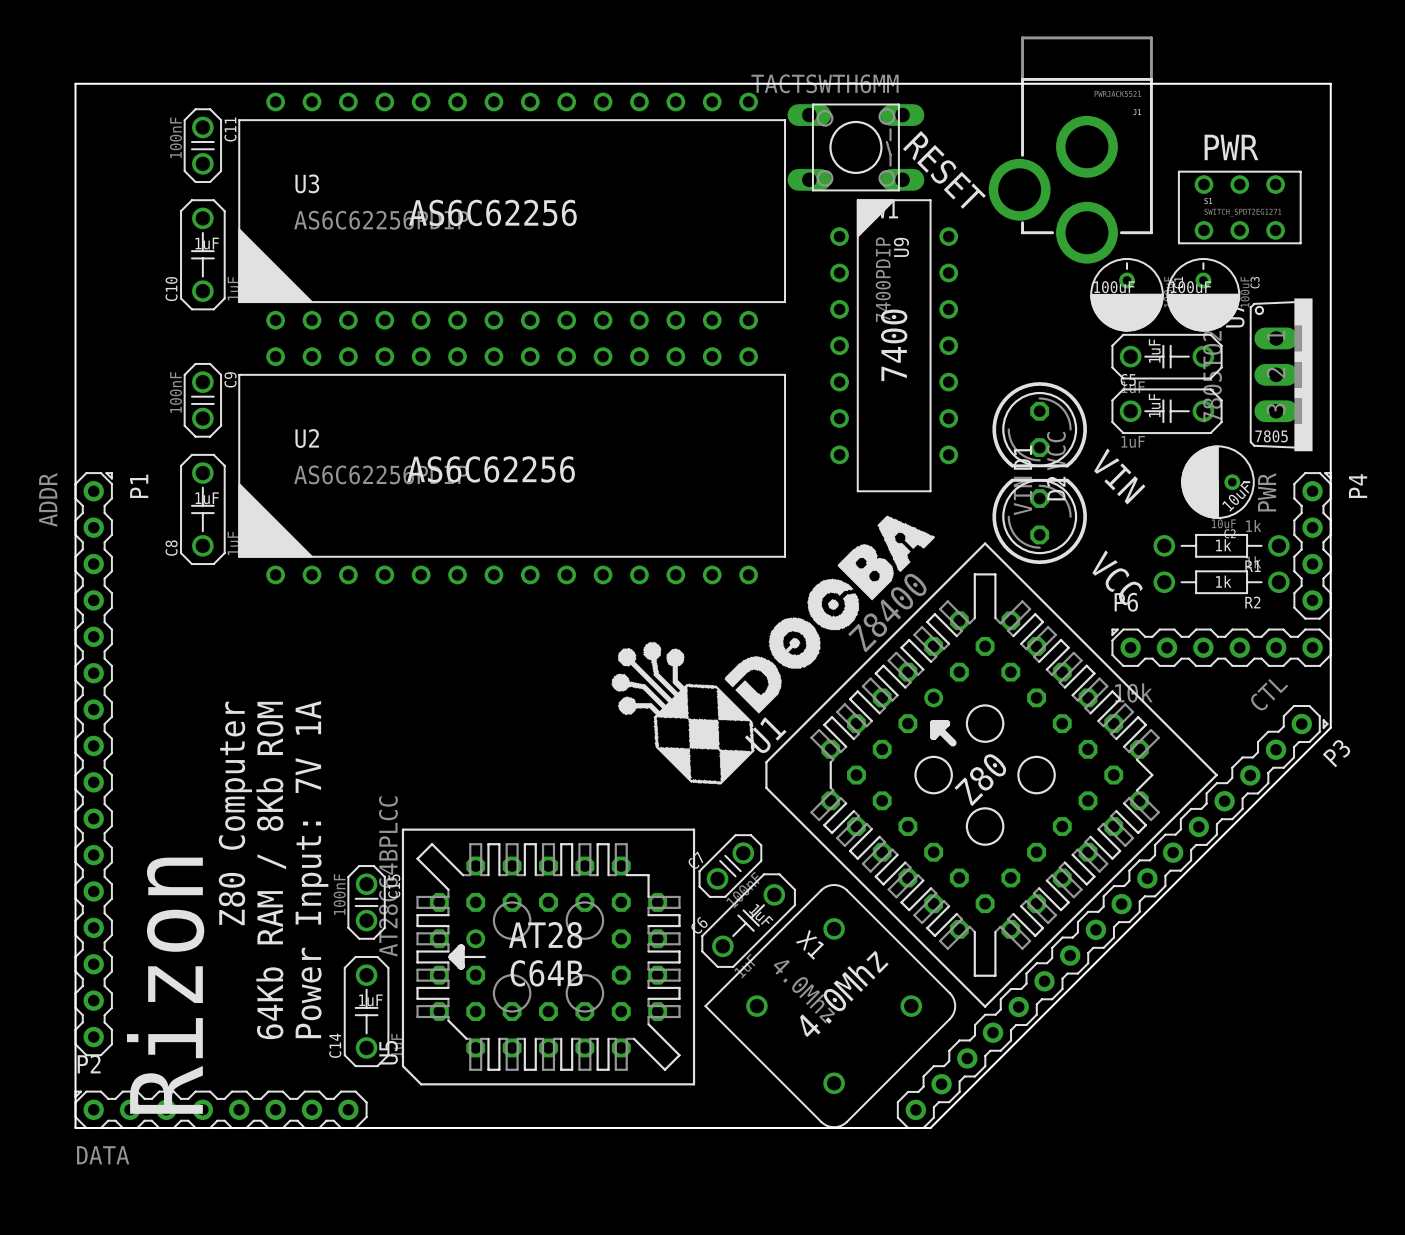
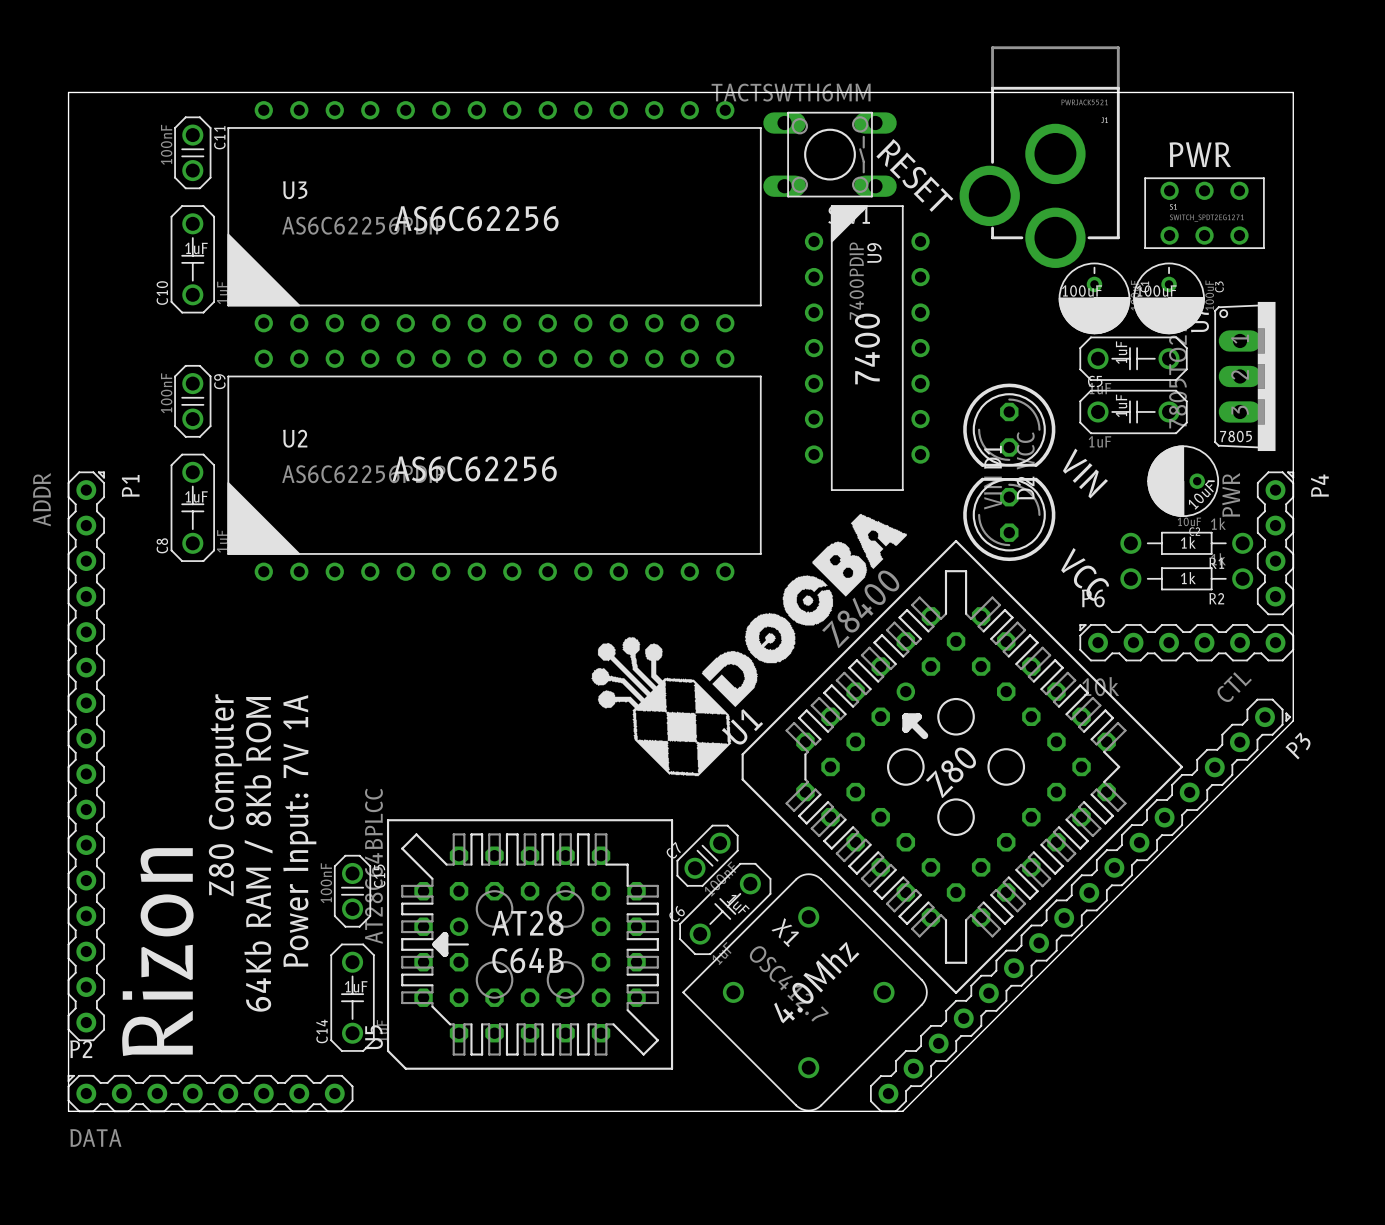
X1 value: 4.0Mhz (804, 991) -> OSC412.7 (789, 983)

